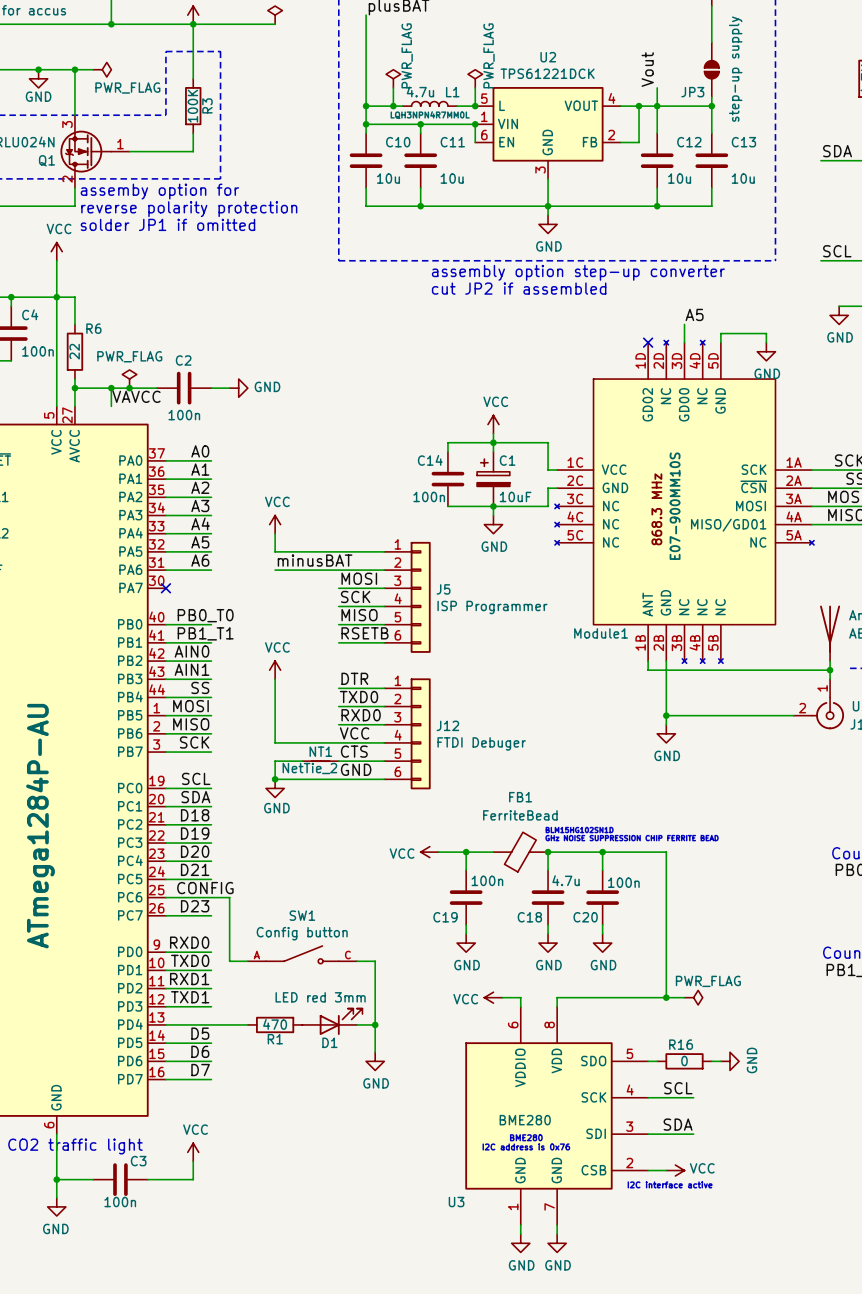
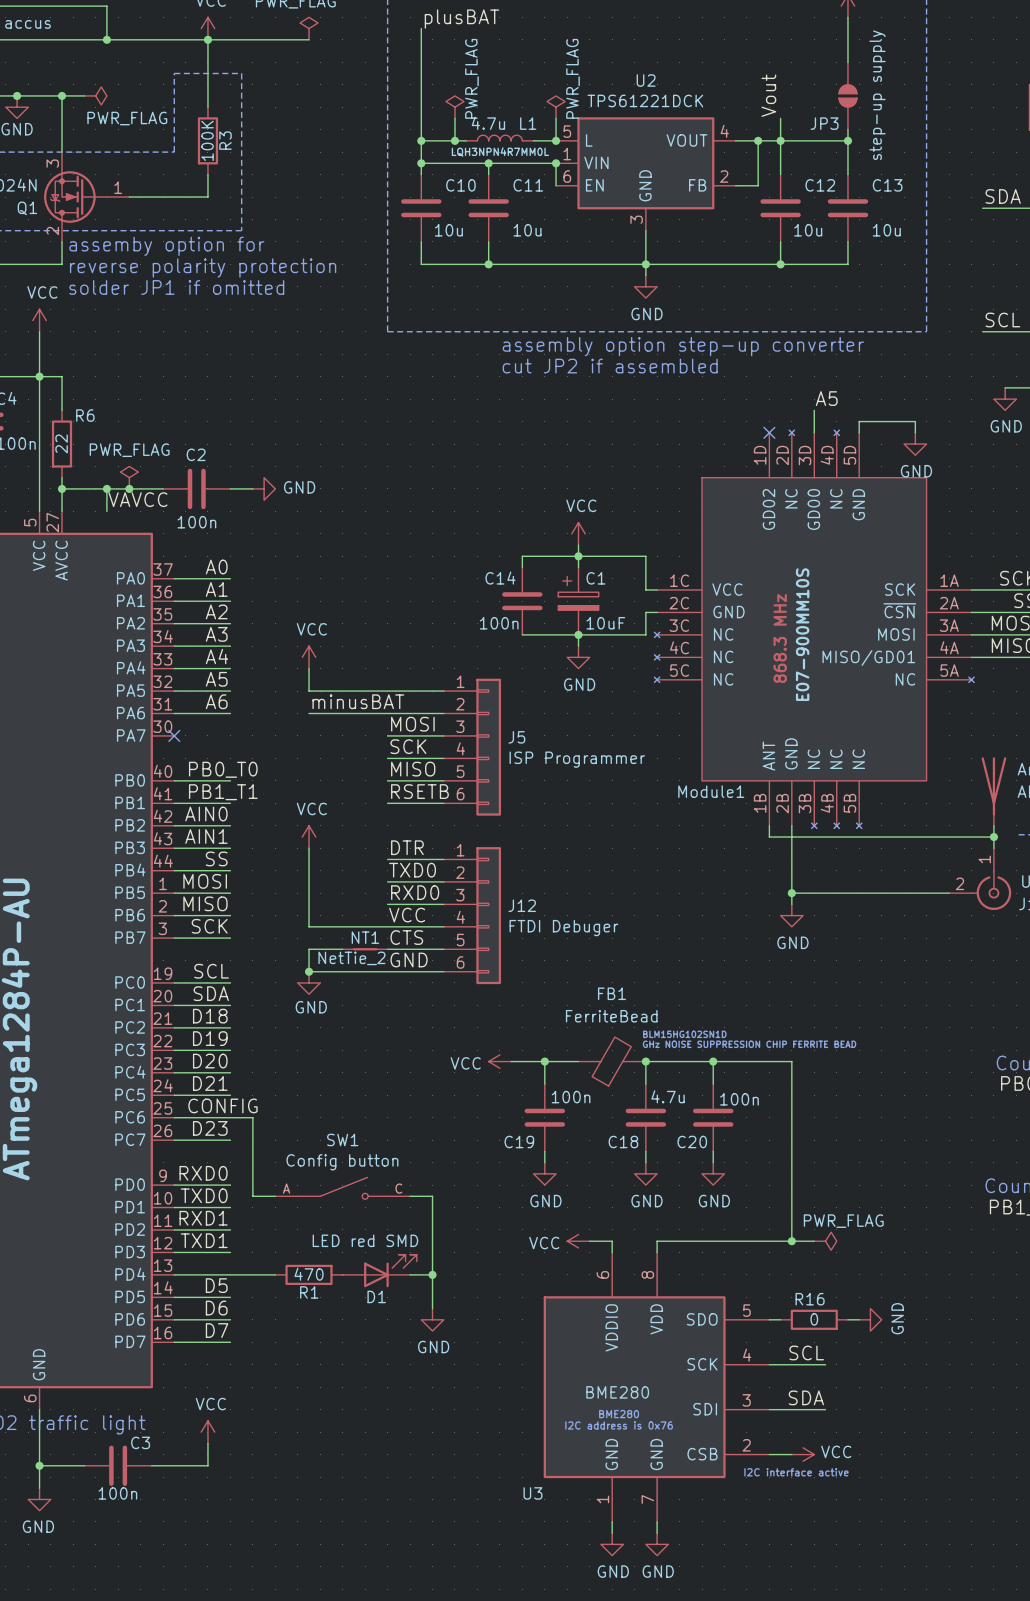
D1 value: LED red 3mm (320, 997) -> LED red SMD (365, 1240)

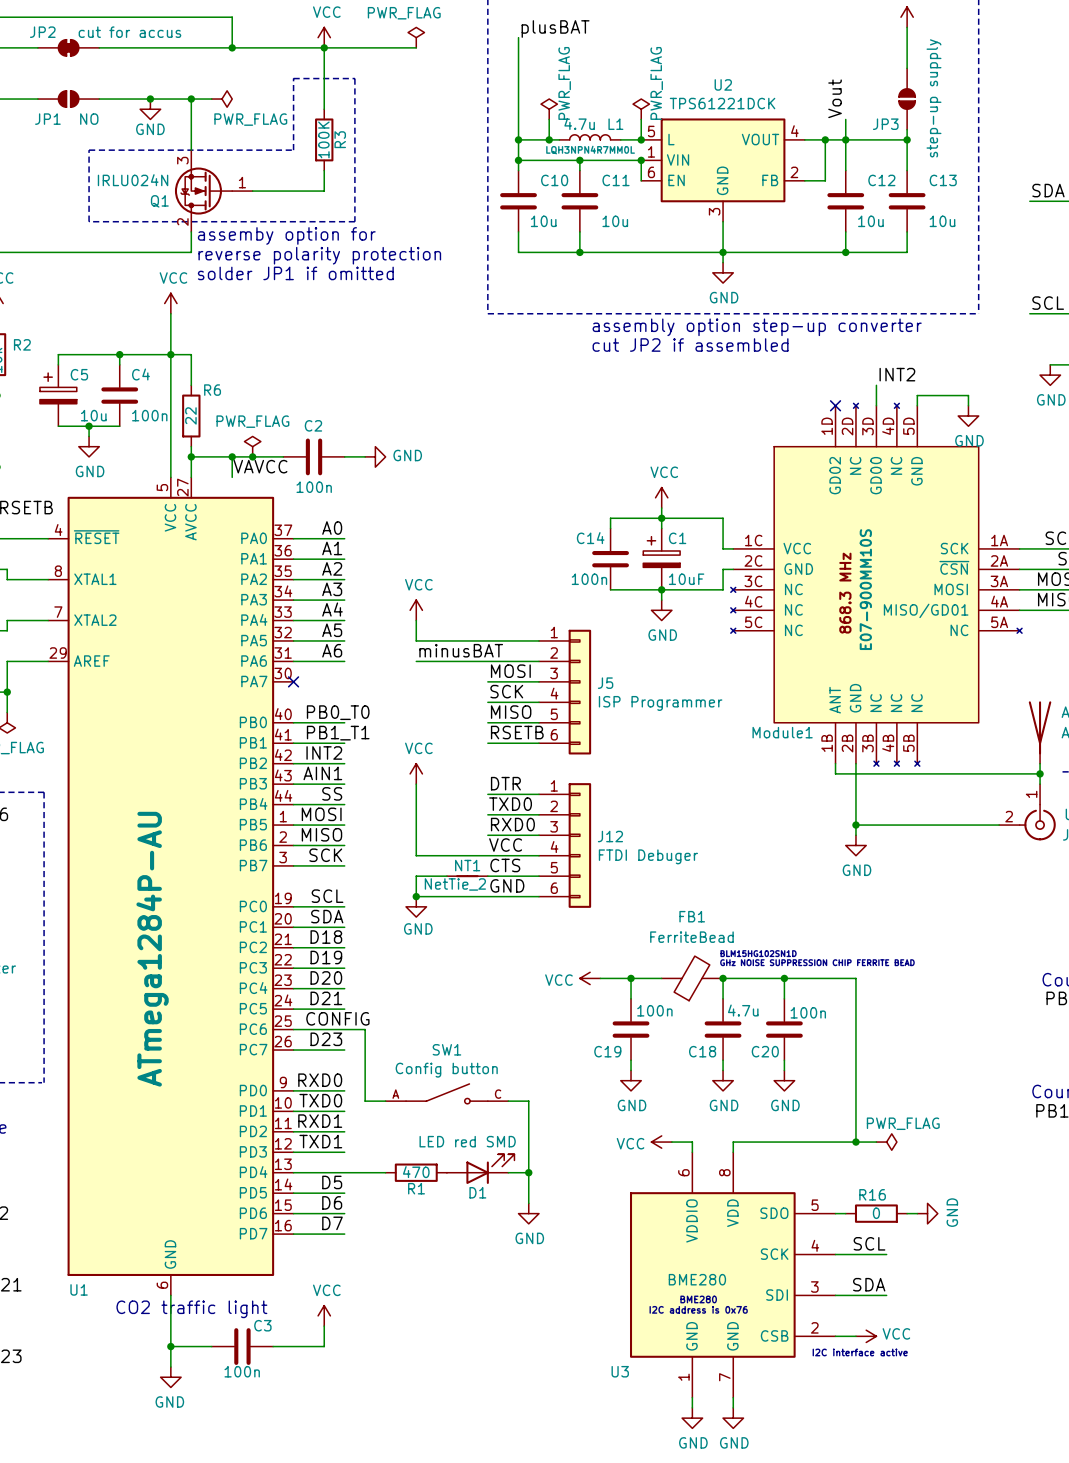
label: A5 (826, 398) -> INT2 (897, 374)
label: AIN0 (206, 814) -> INT2 (324, 752)

